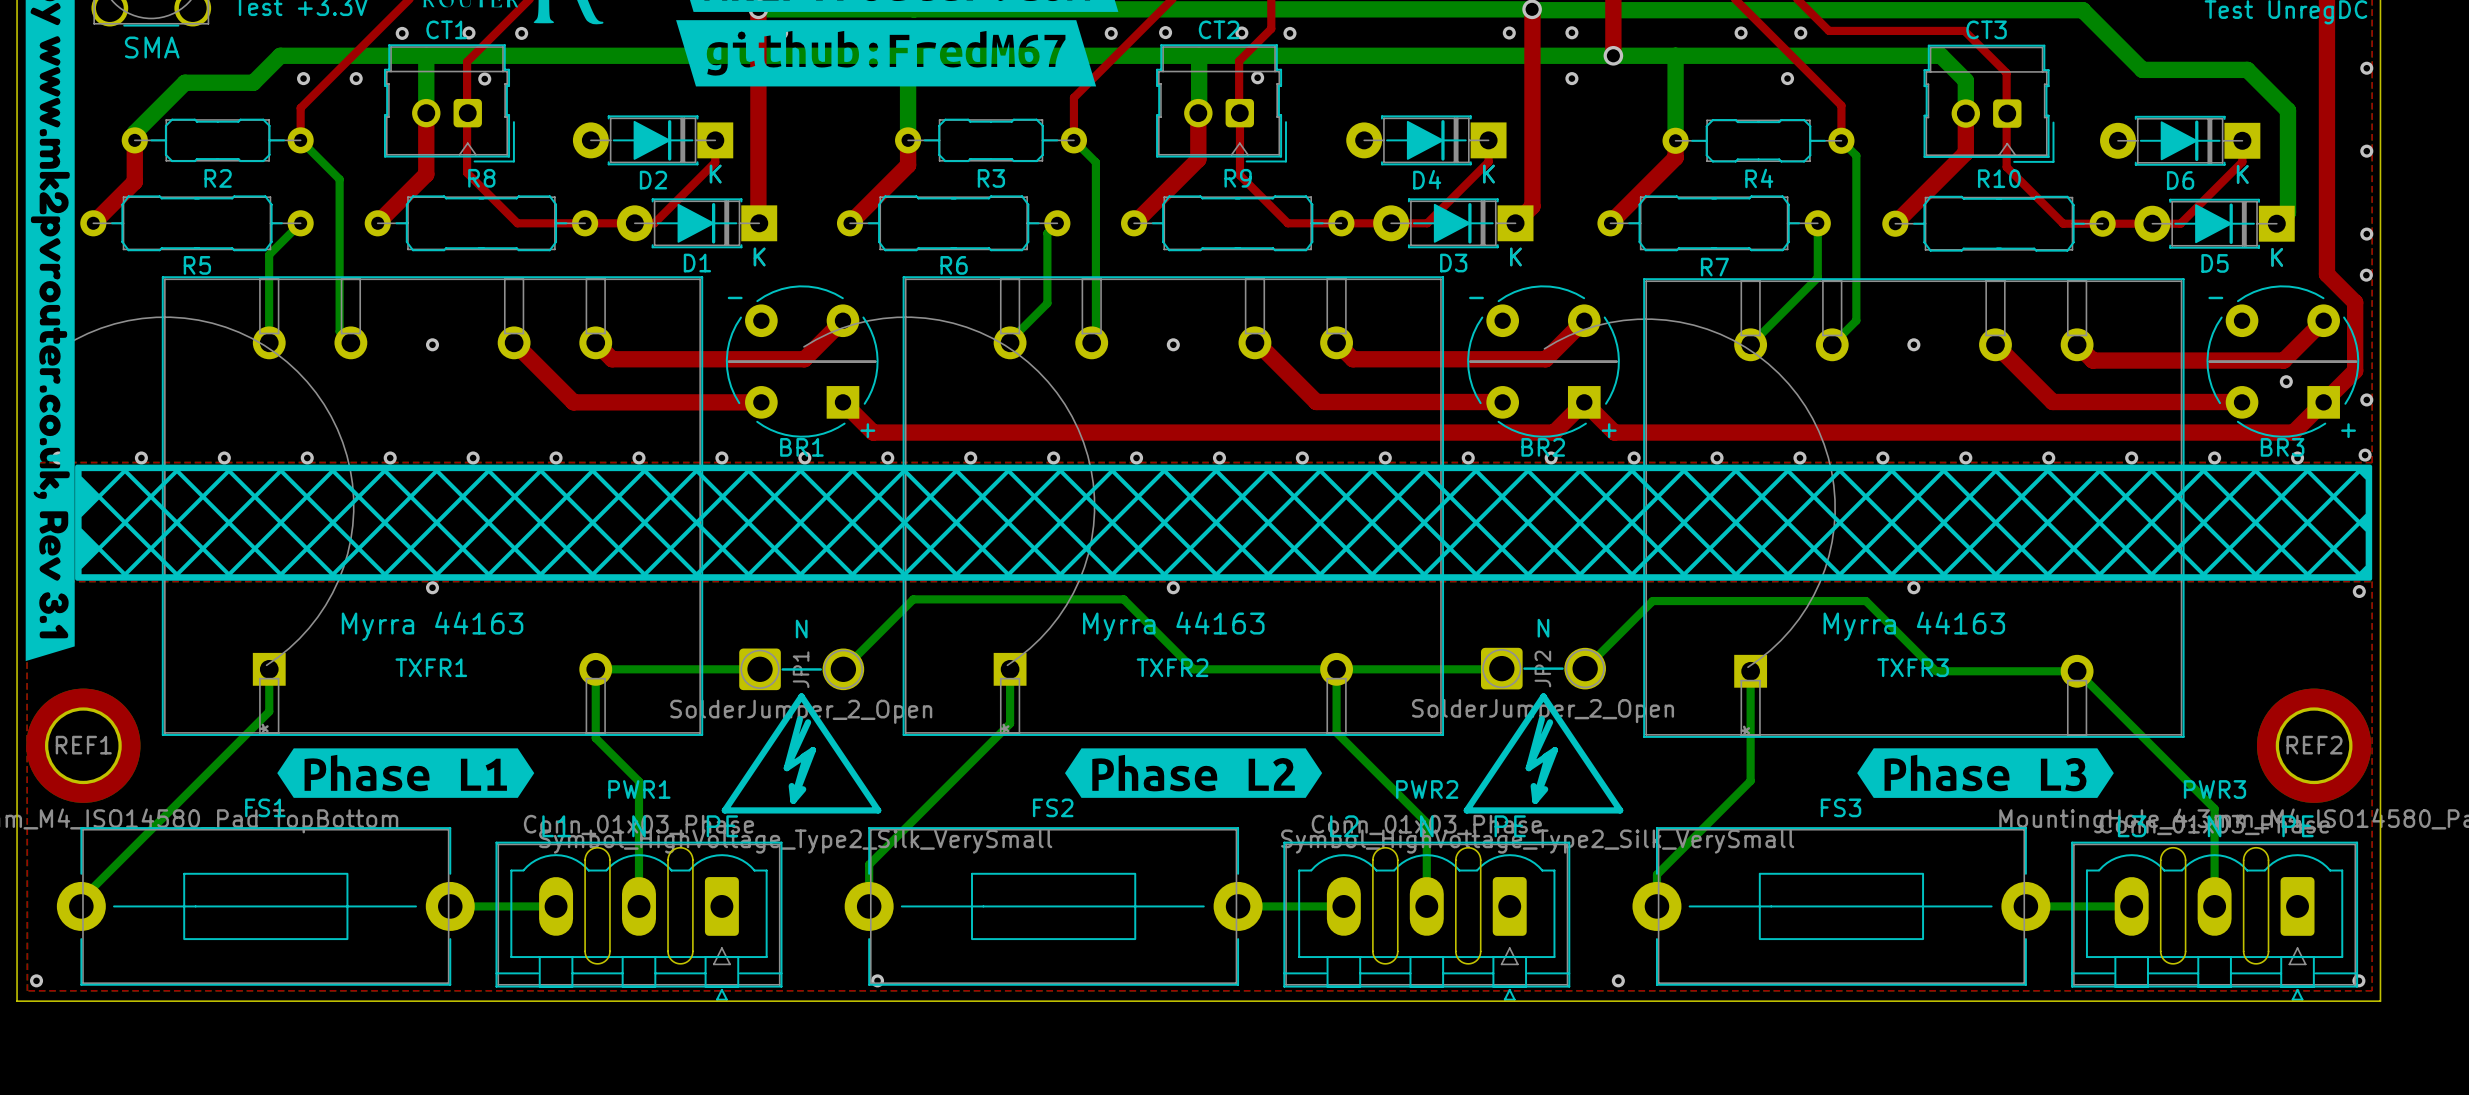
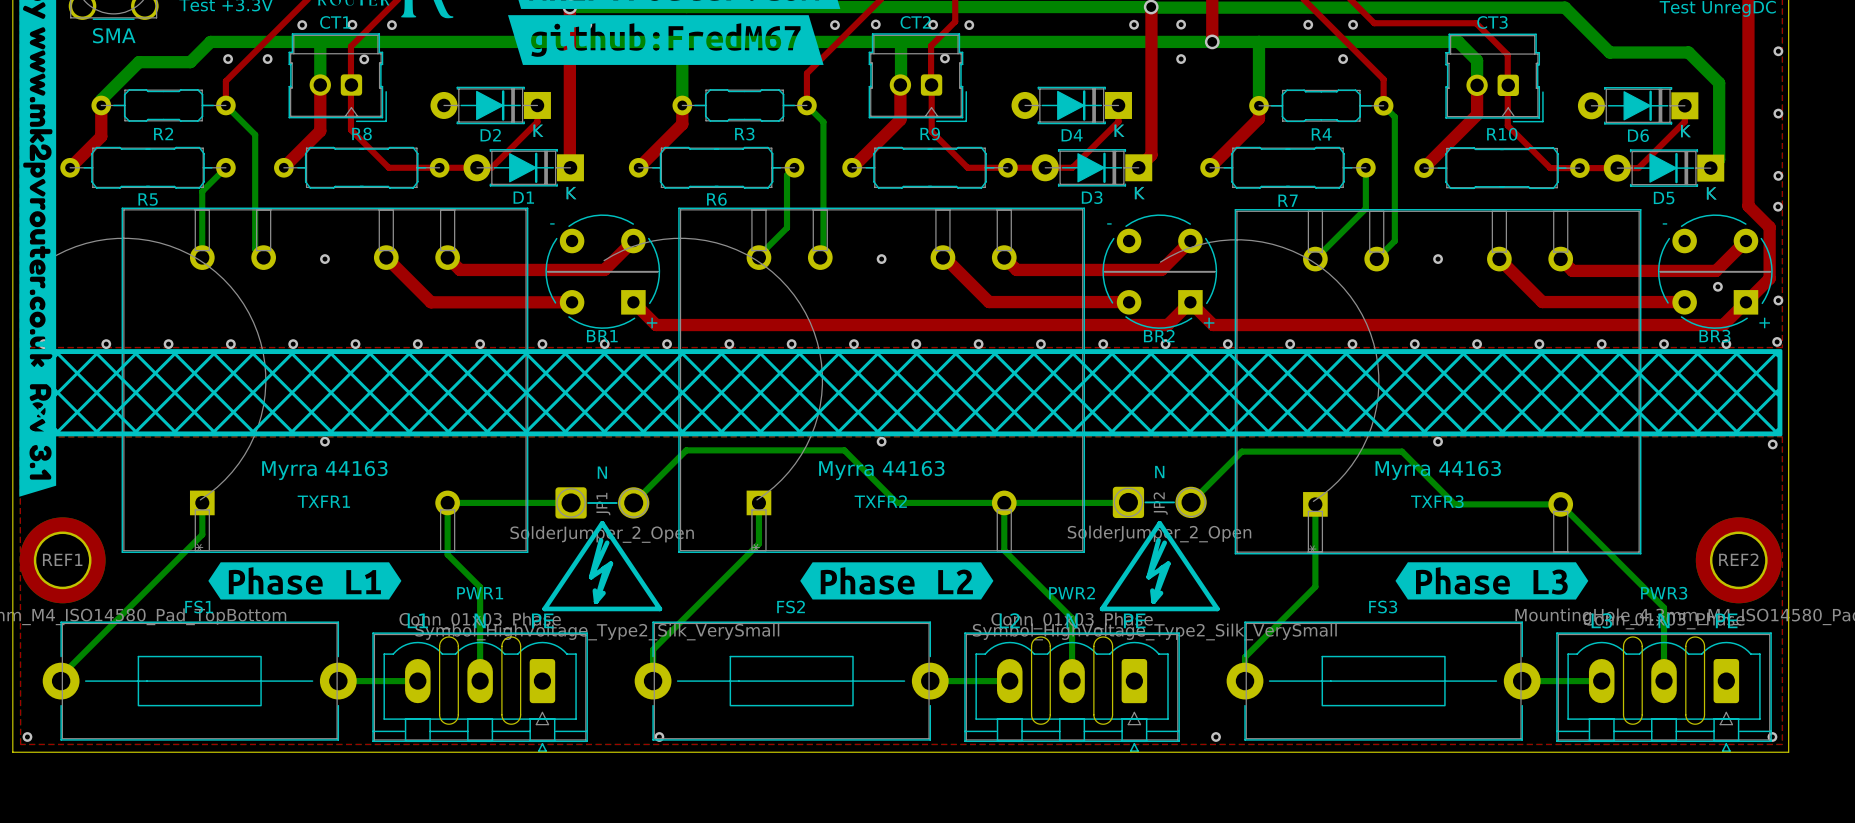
drawing: none -> [20, 349, 1783, 437]
drawing: [75, 464, 2373, 581] -> none

